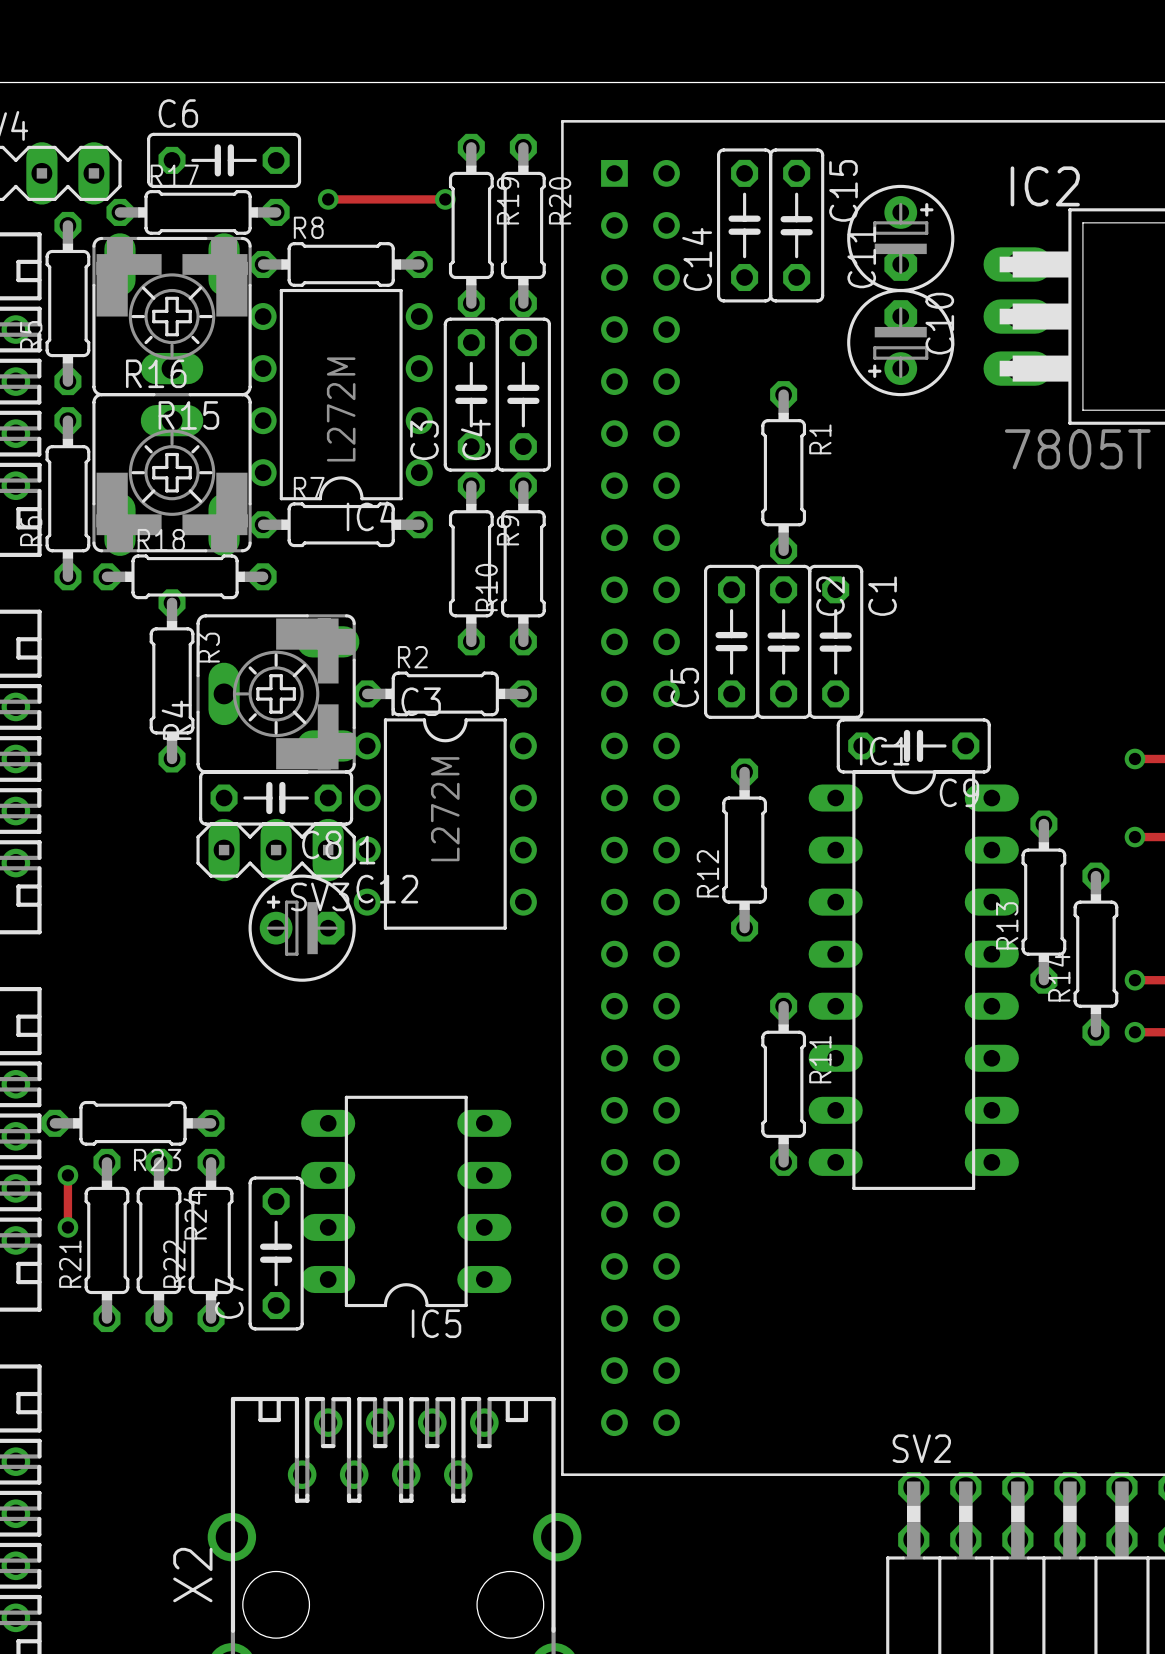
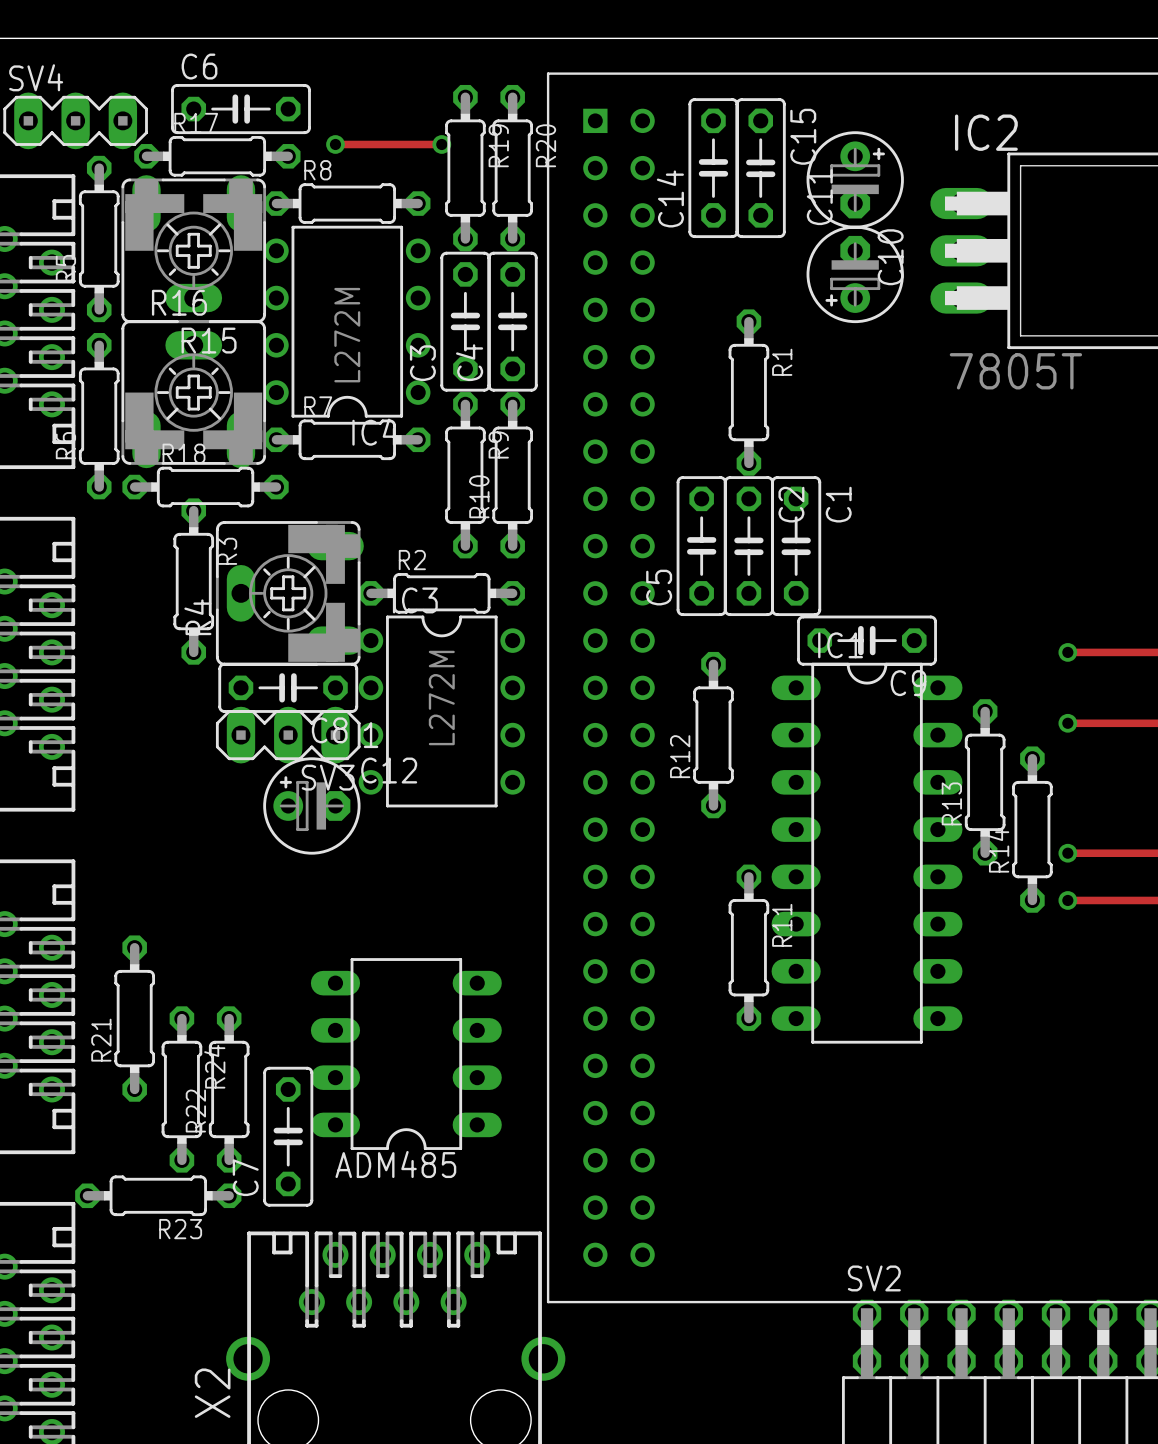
R23 position: (132, 1123) -> (158, 1195)
track: (67, 1175) (67, 1227) -> none
via: (67, 1175) -> none
via: (67, 1227) -> none
R21 position: (106, 1240) -> (134, 1018)
C7 position: (276, 1253) -> (288, 1136)
IC5 name: IC5 (436, 1323) -> ADM485 (395, 1164)

